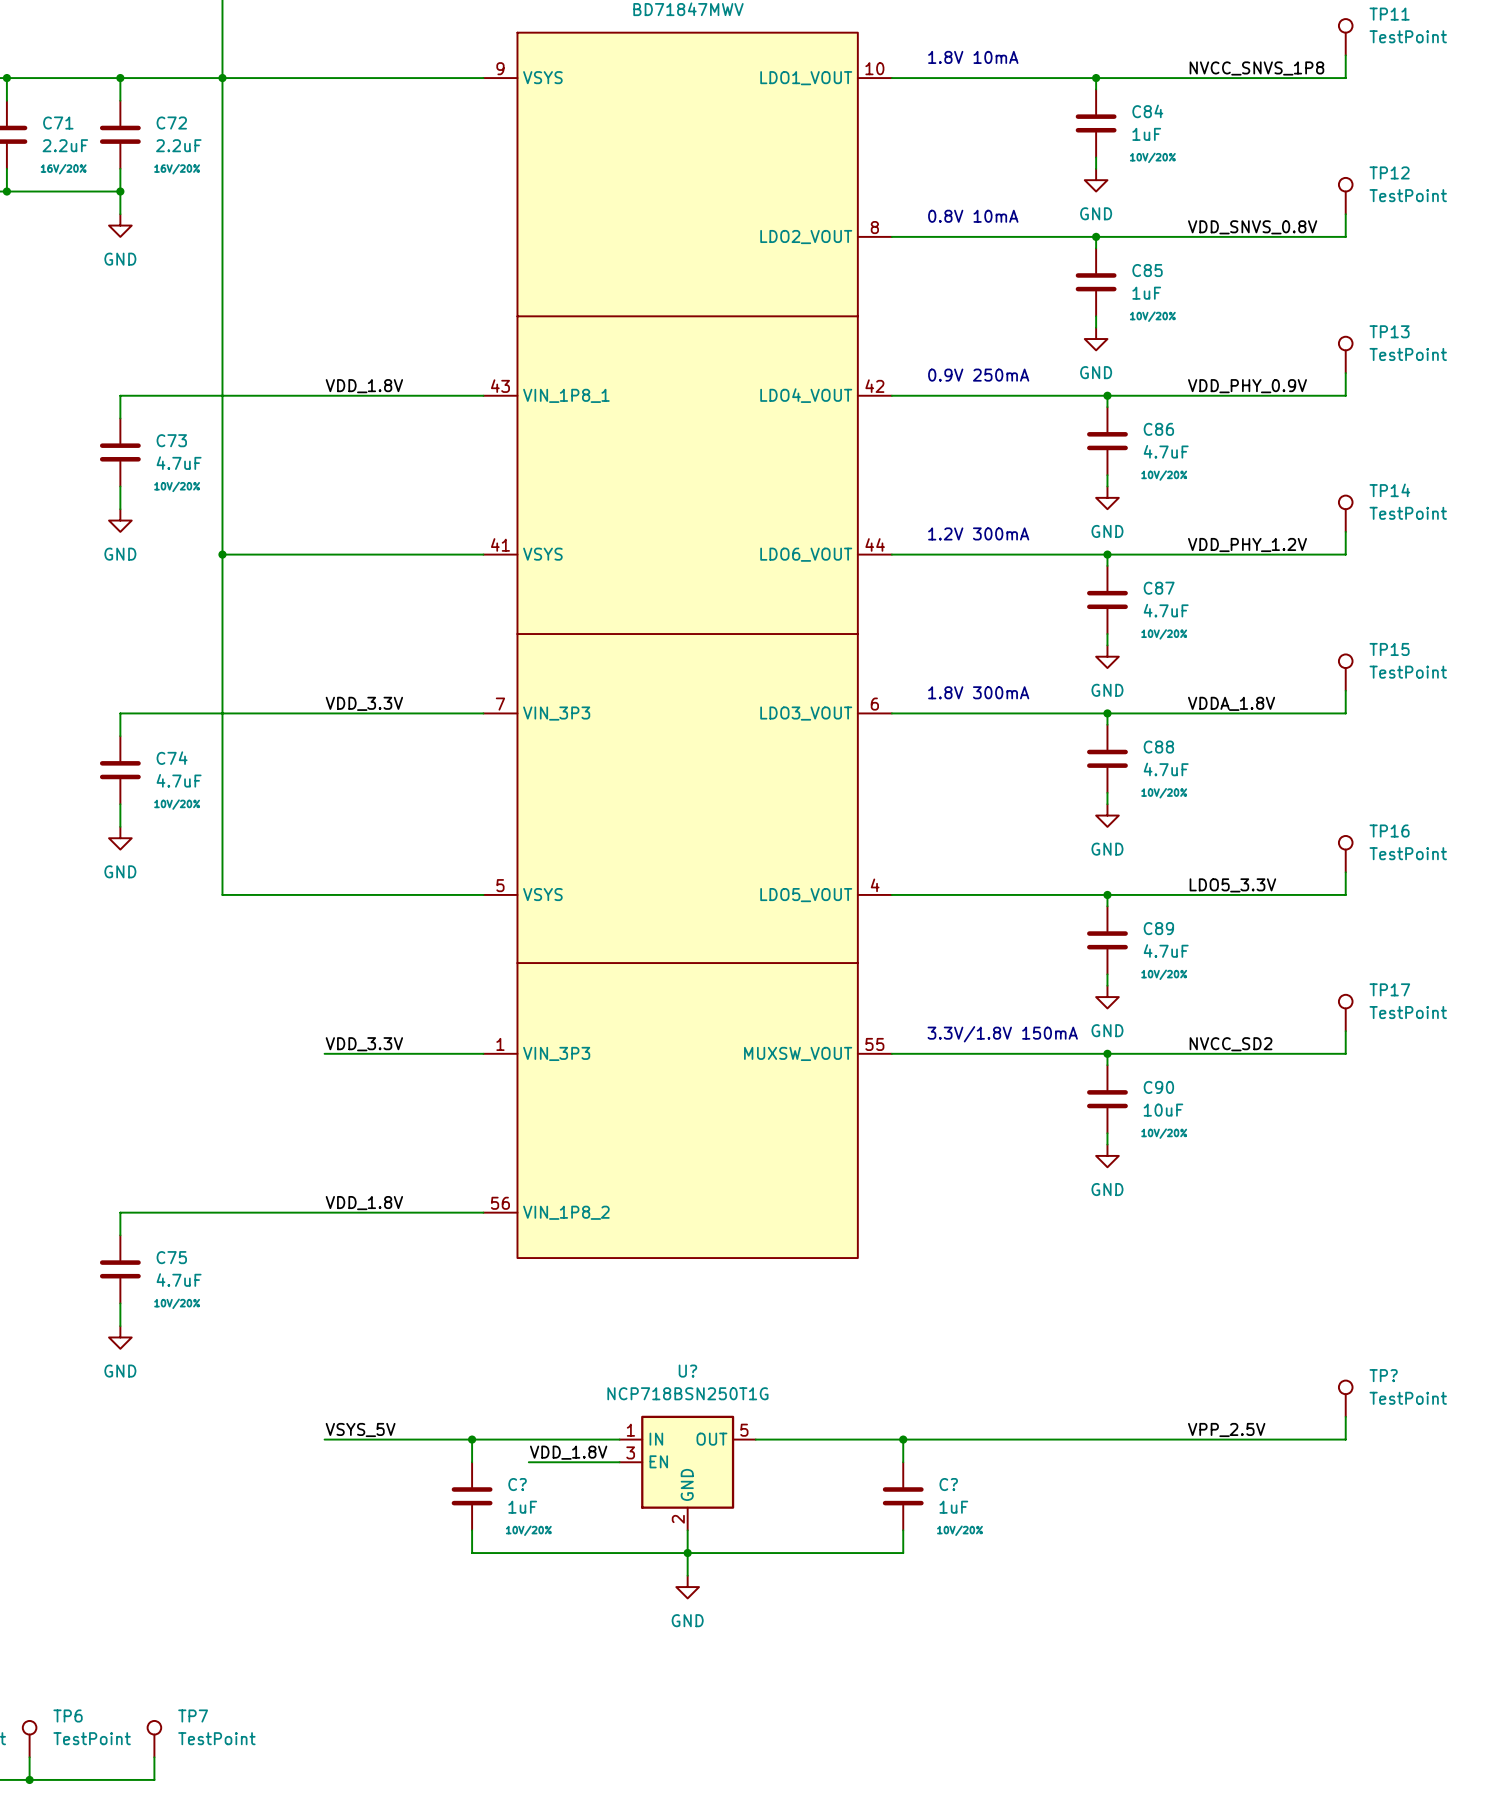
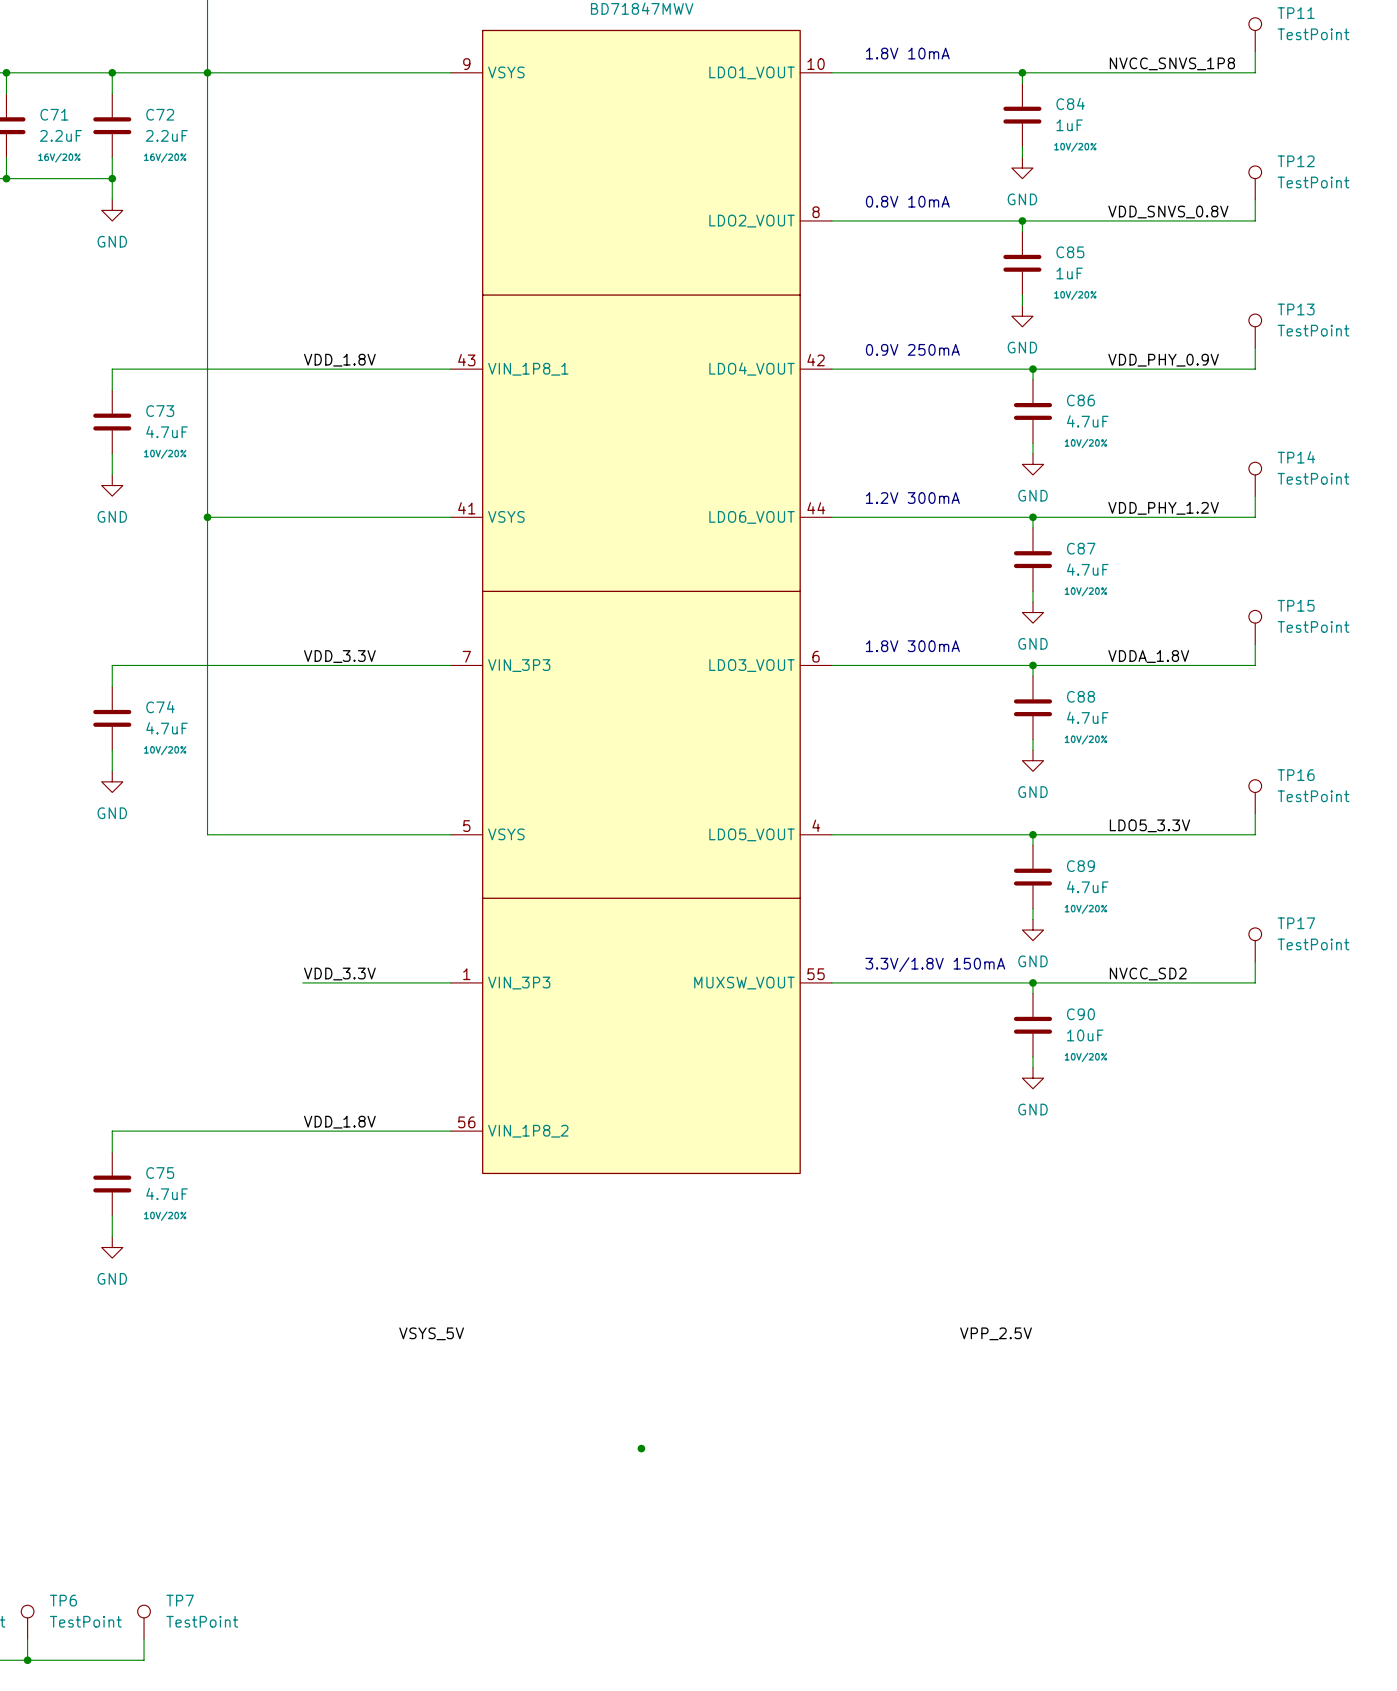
TP?: TestPoint (1345, 1398) -> none
wire: (1345, 1416) (1345, 1439) (755, 1439) -> none
label position: VSYS_5V (360, 1429) -> VSYS_5V (431, 1333)
label position: VPP_2.5V (1226, 1429) -> VPP_2.5V (996, 1333)
wire: (324, 1439) (619, 1439) -> none
wire: (472, 1439) (472, 1462) -> none
junction: (472, 1439) -> none
wire: (903, 1439) (903, 1462) -> none
junction: (903, 1439) -> none
label: VDD_1.8V (568, 1452) -> none
wire: (528, 1462) (619, 1462) -> none
U?: NCP718BSN250T1G (687, 1473) -> none
C?: 1uF (472, 1496) -> none
C?: 1uF (903, 1496) -> none
wire: (472, 1530) (472, 1553) (903, 1553) (903, 1530) -> none
wire: (687, 1530) (687, 1575) -> none
power symbol: GND (687, 1587) -> none

